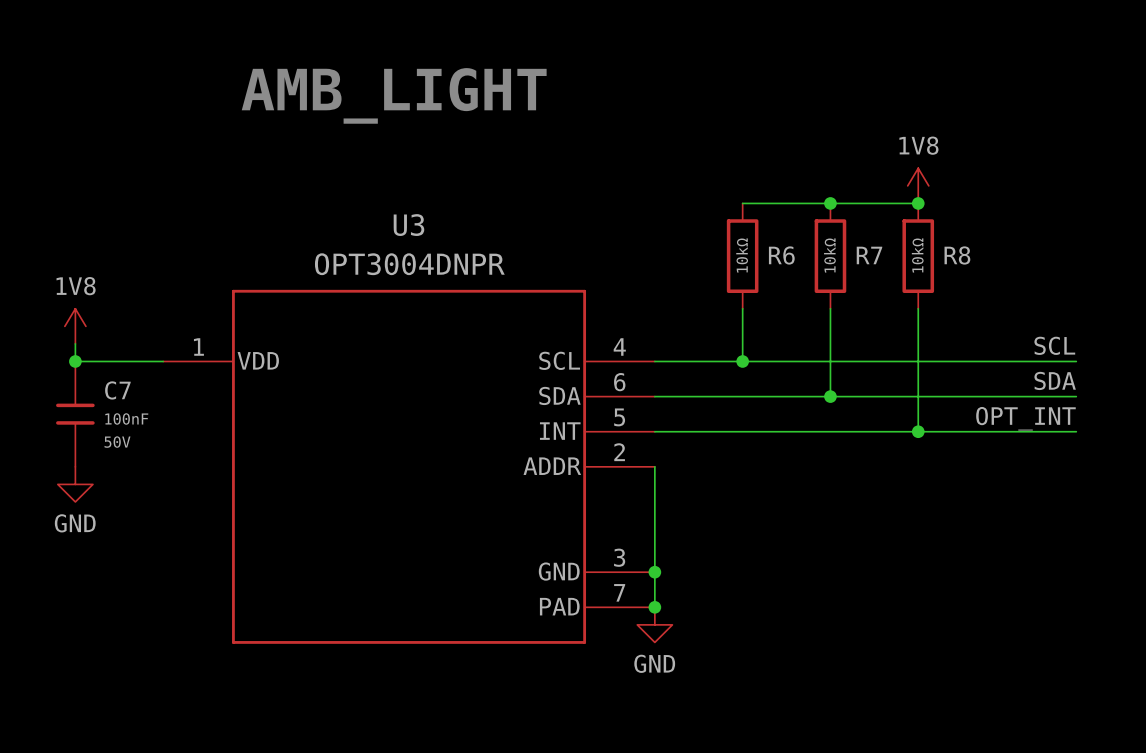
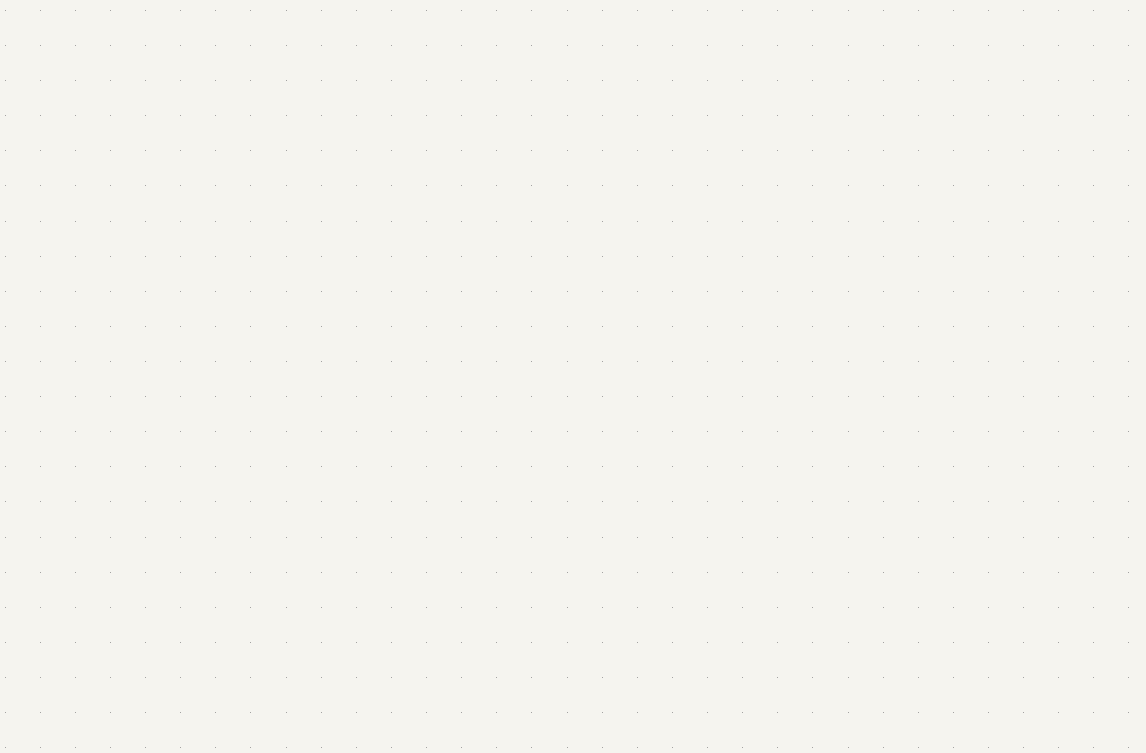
text: AMB_LIGHT (394, 95) -> none
power symbol: 1V8 (918, 185) -> none
wire: (742, 203) (918, 203) -> none
junction: (830, 203) -> none
junction: (918, 203) -> none
R6: 10kΩ (742, 256) -> none
R7: 10kΩ (830, 256) -> none
R8: 10kΩ (918, 256) -> none
wire: (742, 308) (742, 361) -> none
wire: (830, 308) (830, 396) -> none
wire: (918, 308) (918, 431) -> none
power symbol: 1V8 (75, 326) -> none
wire: (75, 343) (75, 361) (163, 361) -> none
label: SCL (1054, 345) -> none
junction: (75, 361) -> none
wire: (654, 361) (1076, 361) -> none
junction: (742, 361) -> none
label: SDA (1055, 380) -> none
wire: (654, 396) (1076, 396) -> none
junction: (830, 396) -> none
C7: 100nF (75, 414) -> none
label: OPT_INT (1025, 418) -> none
wire: (654, 431) (1076, 431) -> none
junction: (918, 431) -> none
U3: OPT3004DNPR (409, 466) -> none
wire: (654, 466) (654, 607) -> none
power symbol: GND (75, 484) -> none
junction: (654, 572) -> none
junction: (654, 607) -> none
power symbol: GND (654, 624) -> none

